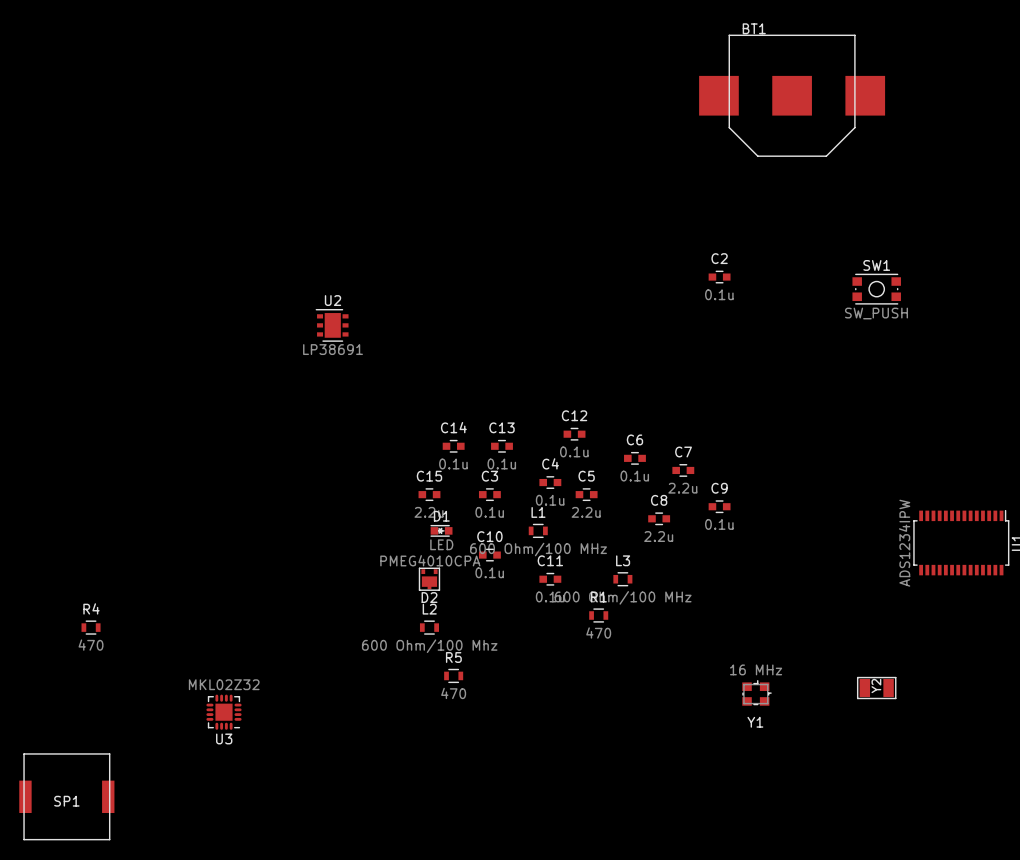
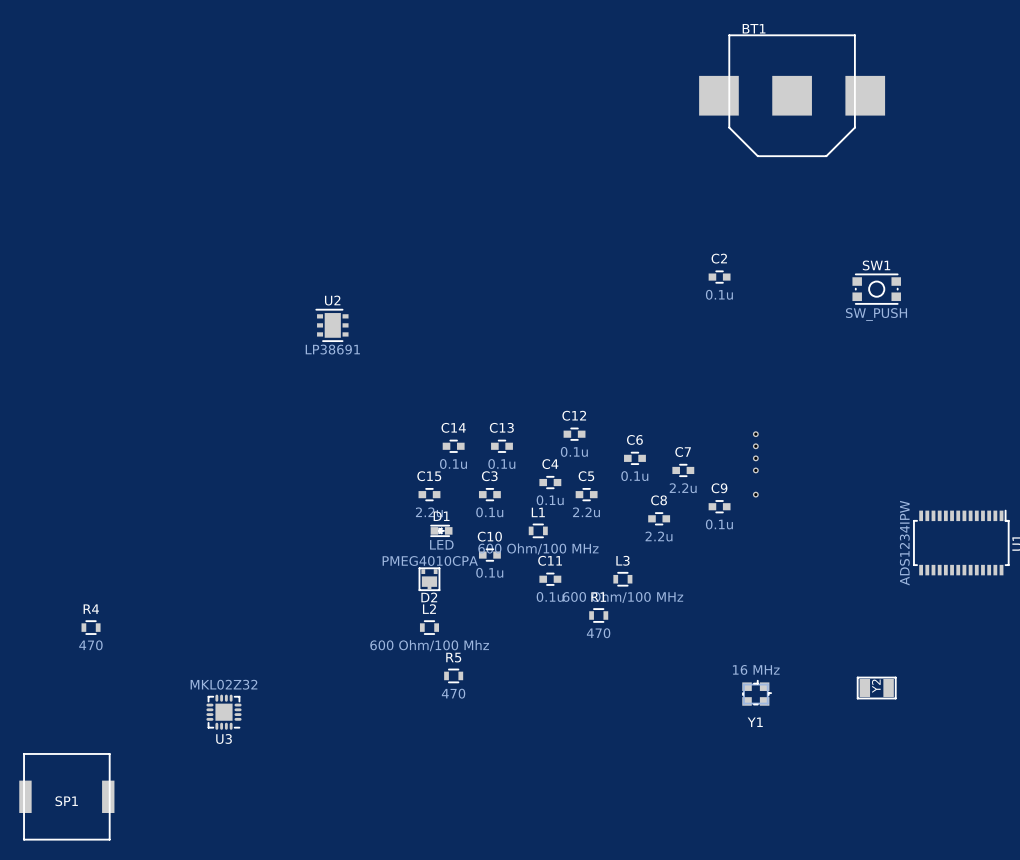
part: none -> (755, 434)
part: none -> (755, 446)
part: none -> (755, 458)
part: none -> (755, 470)
part: none -> (755, 494)

